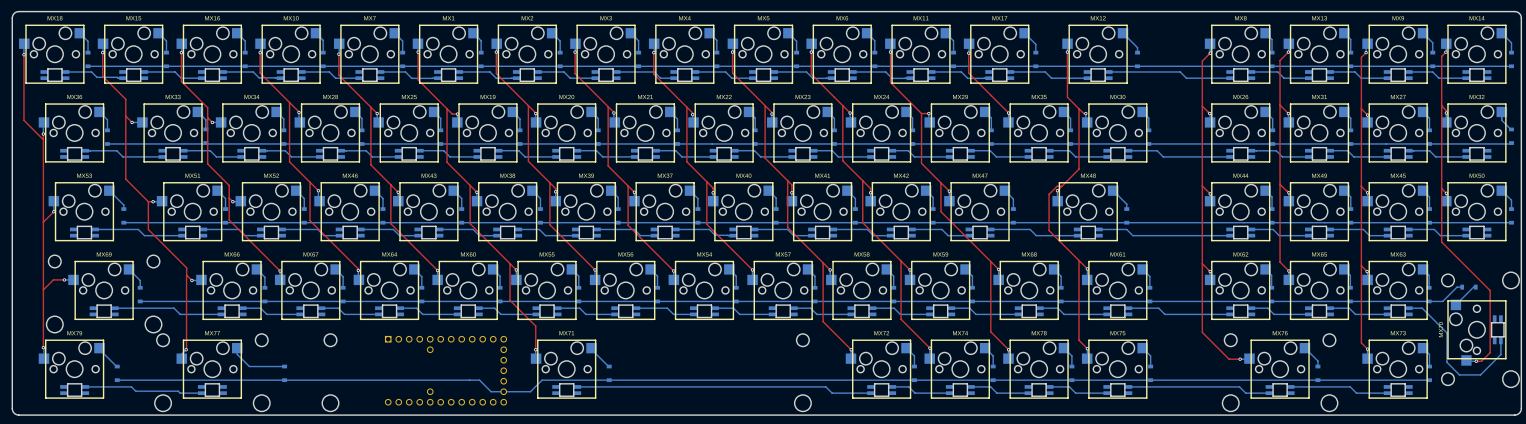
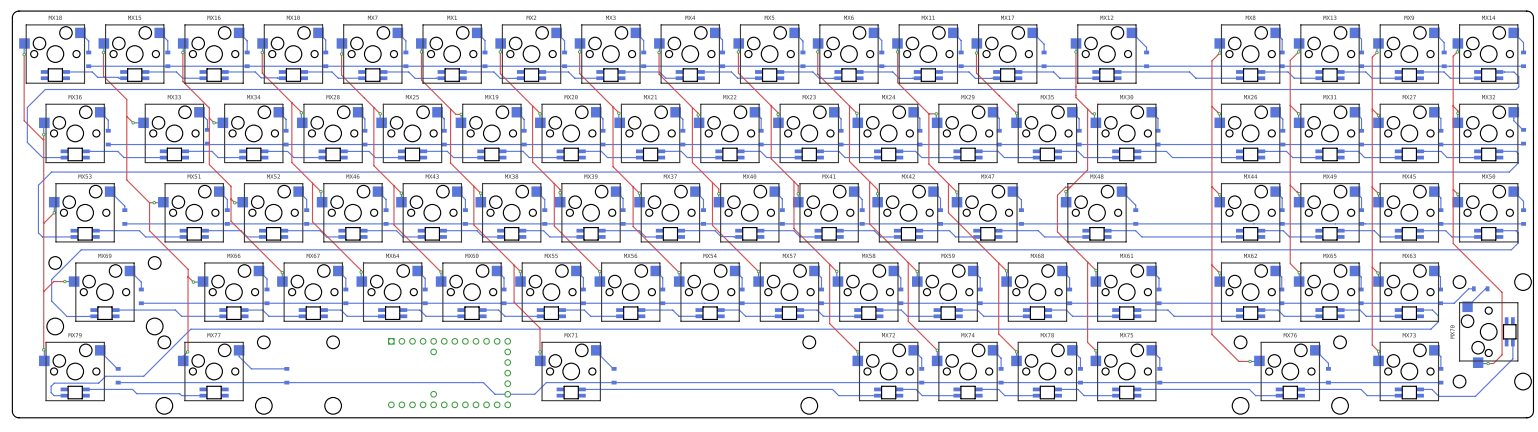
bottom track: none -> (1499, 71) (1514, 72) (1518, 76) (1518, 86) (1516, 89) (45, 89) (27, 107) (27, 142) (42, 157) (64, 157)
bottom track: none -> (1499, 151) (1516, 151) (1518, 153) (1518, 163) (1509, 172) (51, 172) (38, 185) (38, 232) (42, 236) (74, 236)
bottom track: none -> (1499, 230) (1516, 230) (1518, 232) (1518, 242) (1511, 249) (81, 249) (51, 279) (51, 301) (67, 316) (94, 316)
bottom track: (1421, 308) (1446, 332) (1446, 362) (1459, 374) (1480, 374) (1500, 354) -> (1420, 389) (1431, 389) (1438, 396) (1475, 396) (1512, 356)
bottom track: none -> (1432, 310) (1438, 315) (1438, 321) (1430, 329) (190, 329) (143, 376) (105, 376) (98, 383) (54, 383) (51, 386) (51, 392) (54, 395) (64, 395)

